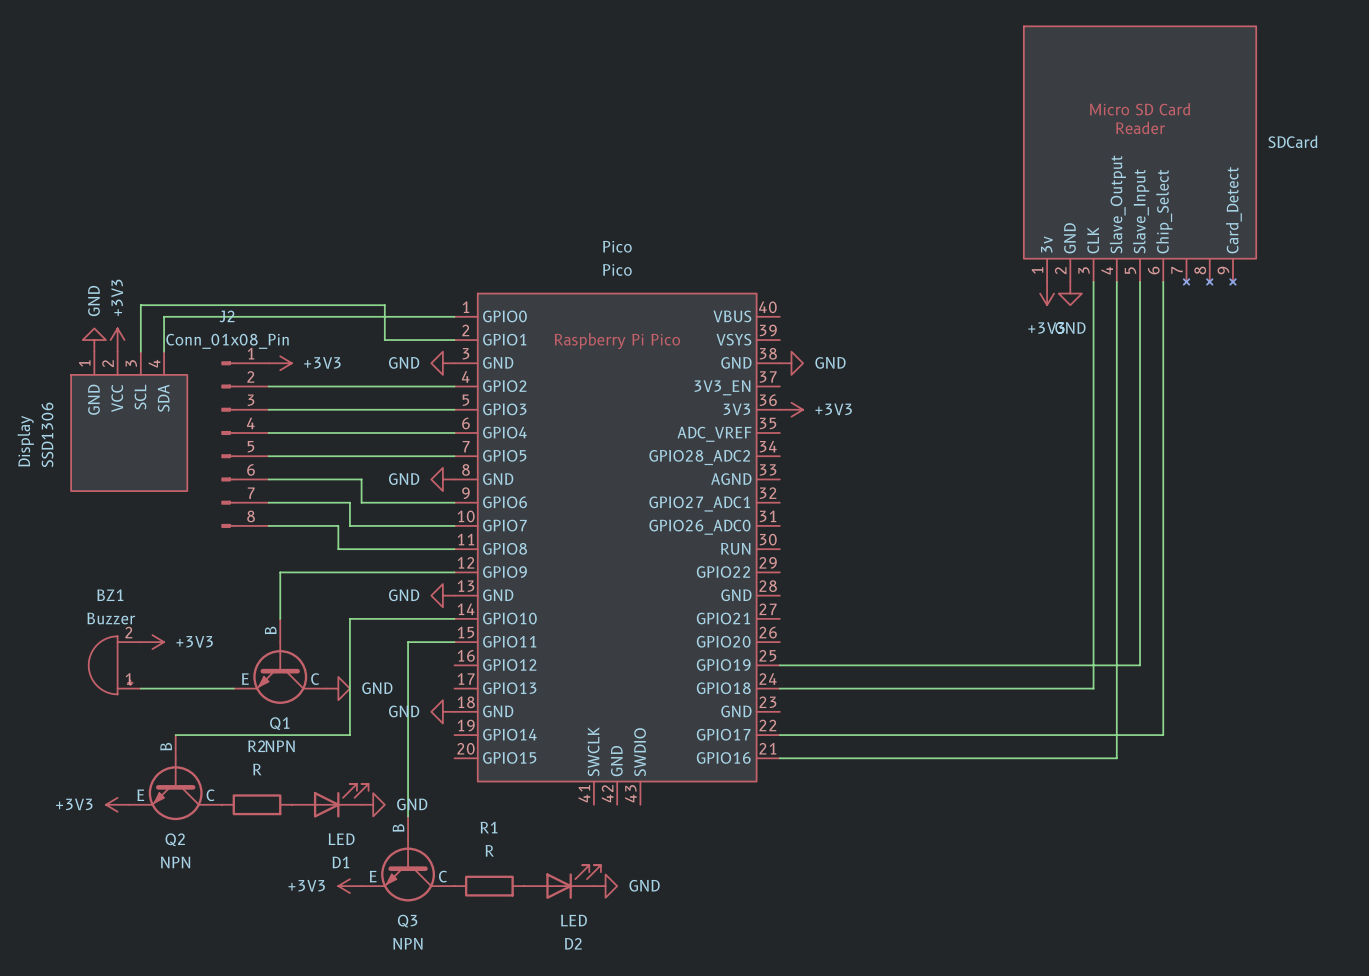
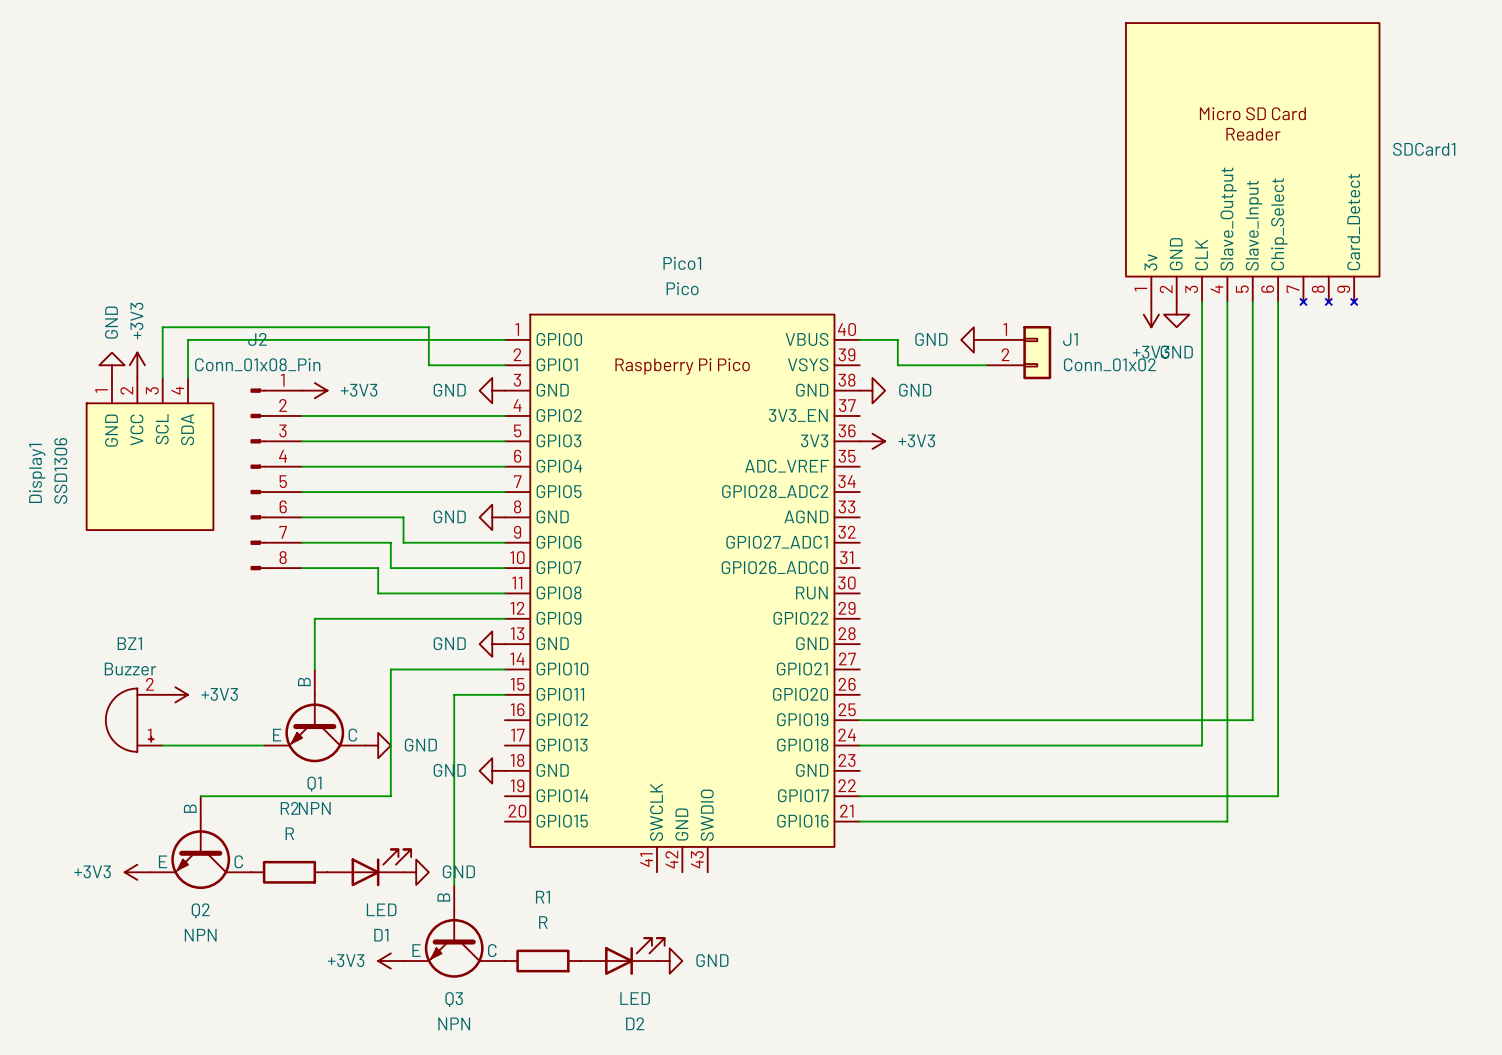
SDCard name: SDCard (1292, 141) -> SDCard1 (1424, 149)
Pico name: Pico (617, 246) -> Pico1 (682, 263)
wire: none -> (859, 339) (897, 339) (897, 365) (986, 365)
power symbol: none -> GND (973, 339)
J1: none -> Conn_01x02 (1018, 352)
Display name: Display (25, 441) -> Display1 (37, 473)

